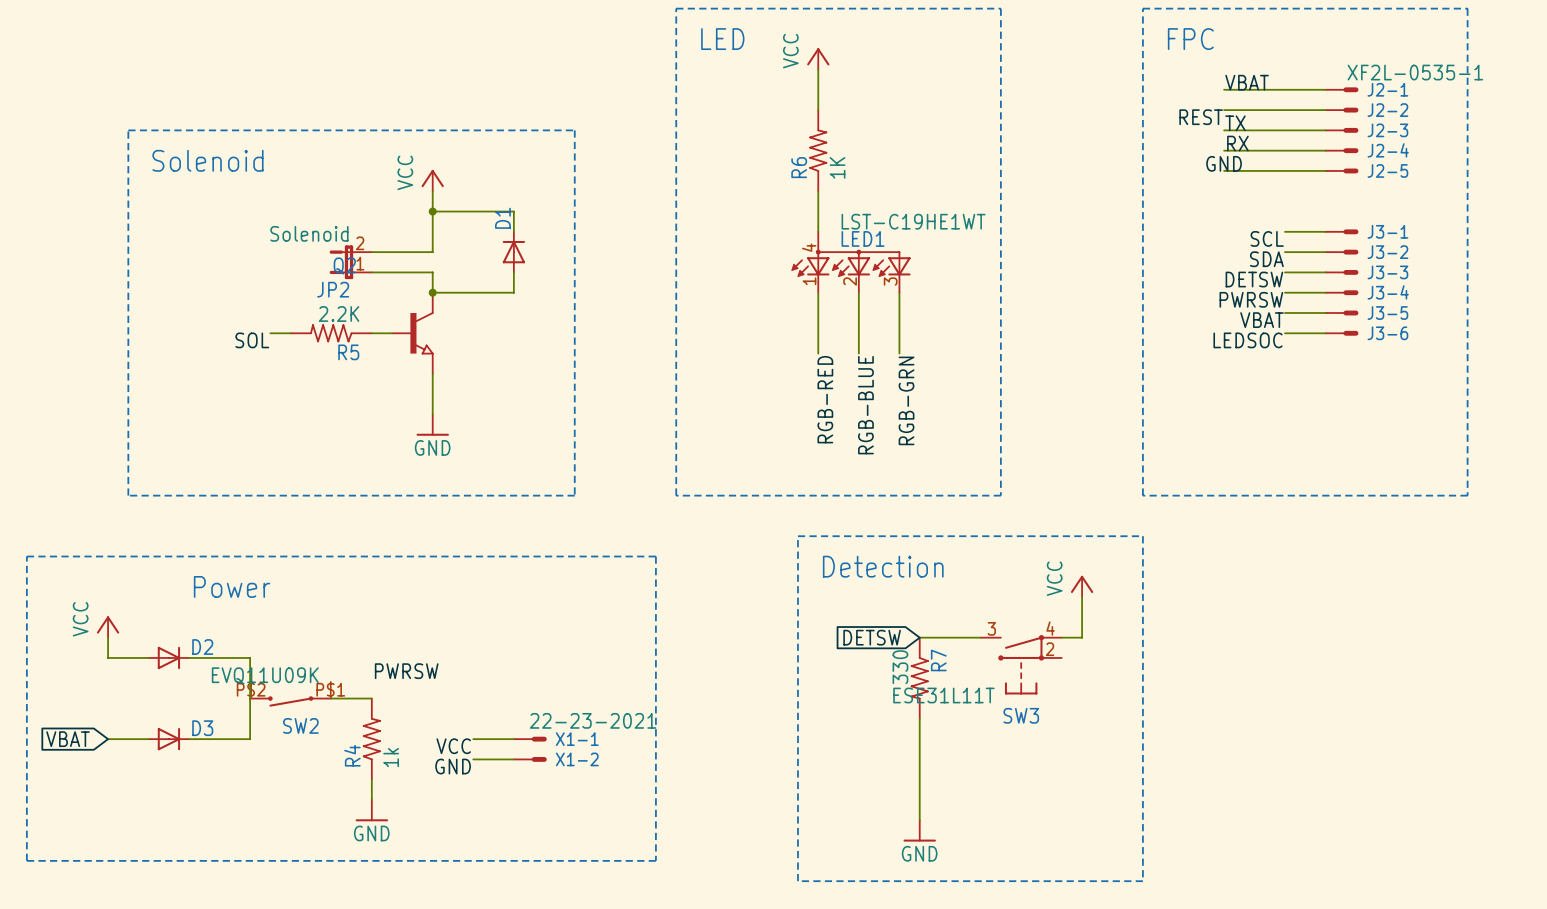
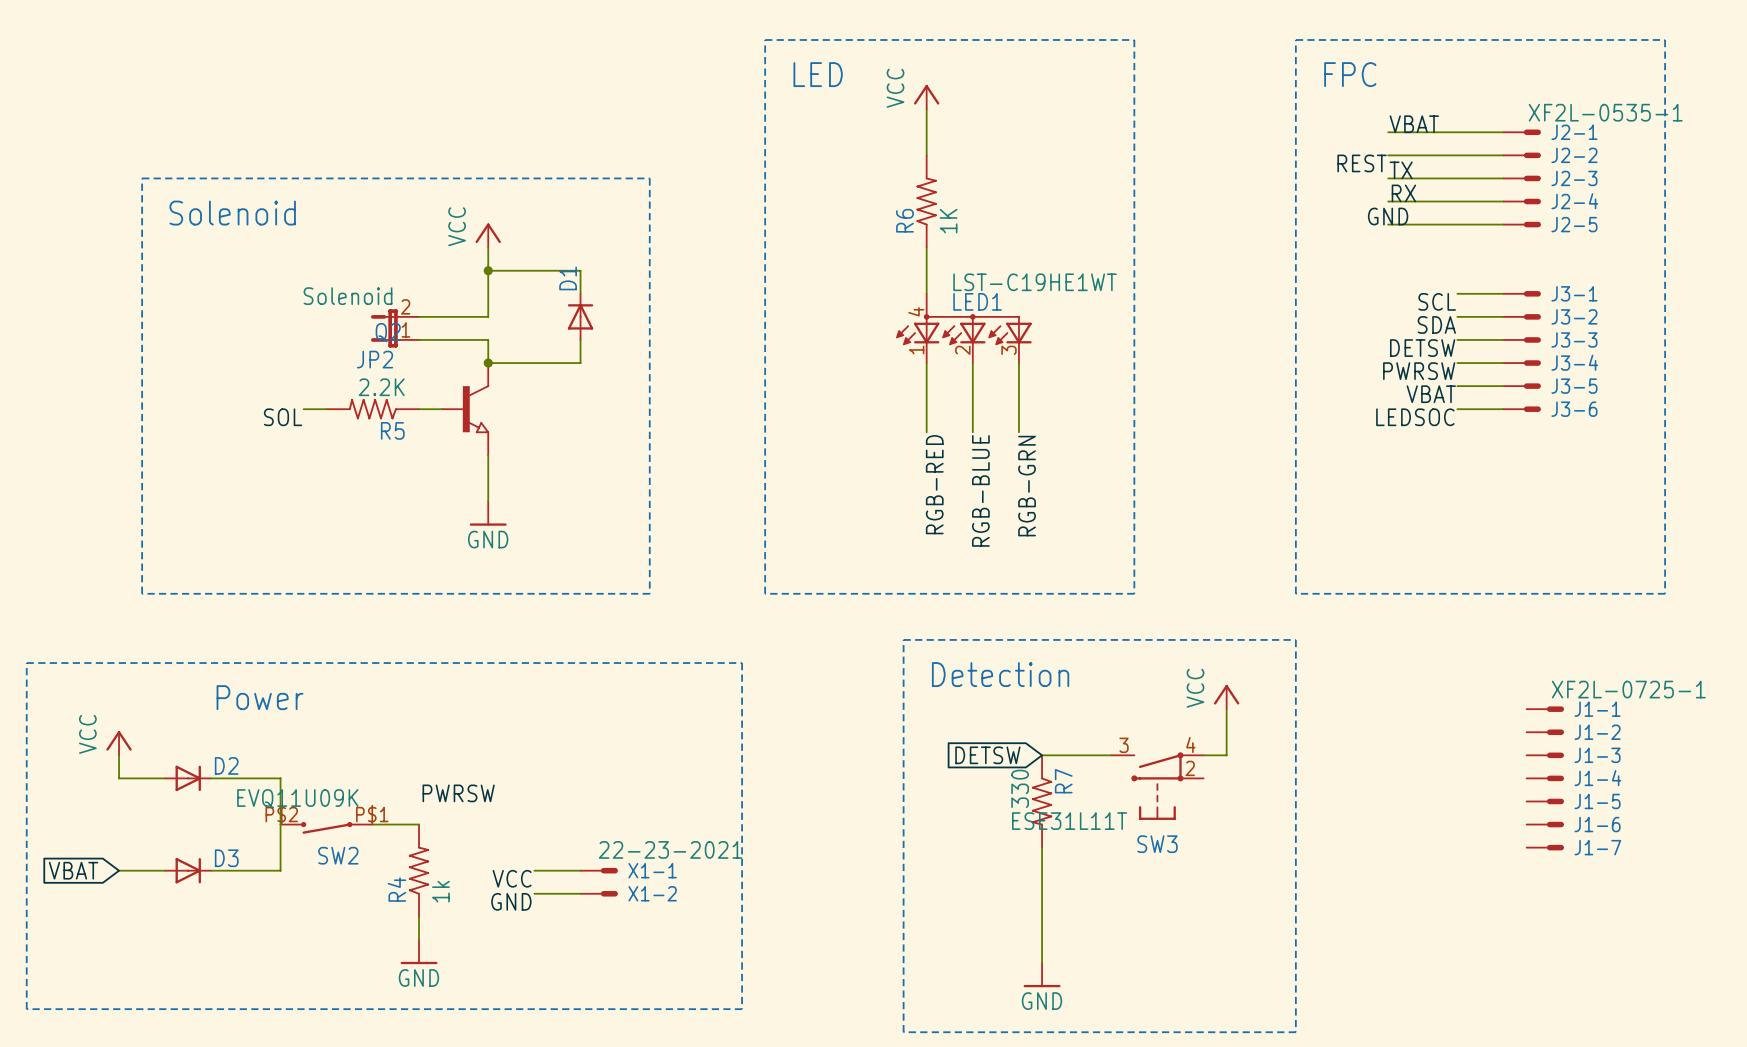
J1-1: none -> XF2L-0725-1 (1545, 709)
J1-2: none -> (1545, 732)
J1-3: none -> (1545, 755)
J1-4: none -> (1545, 778)
J1-5: none -> (1545, 801)
J1-6: none -> (1545, 824)
J1-7: none -> (1545, 847)

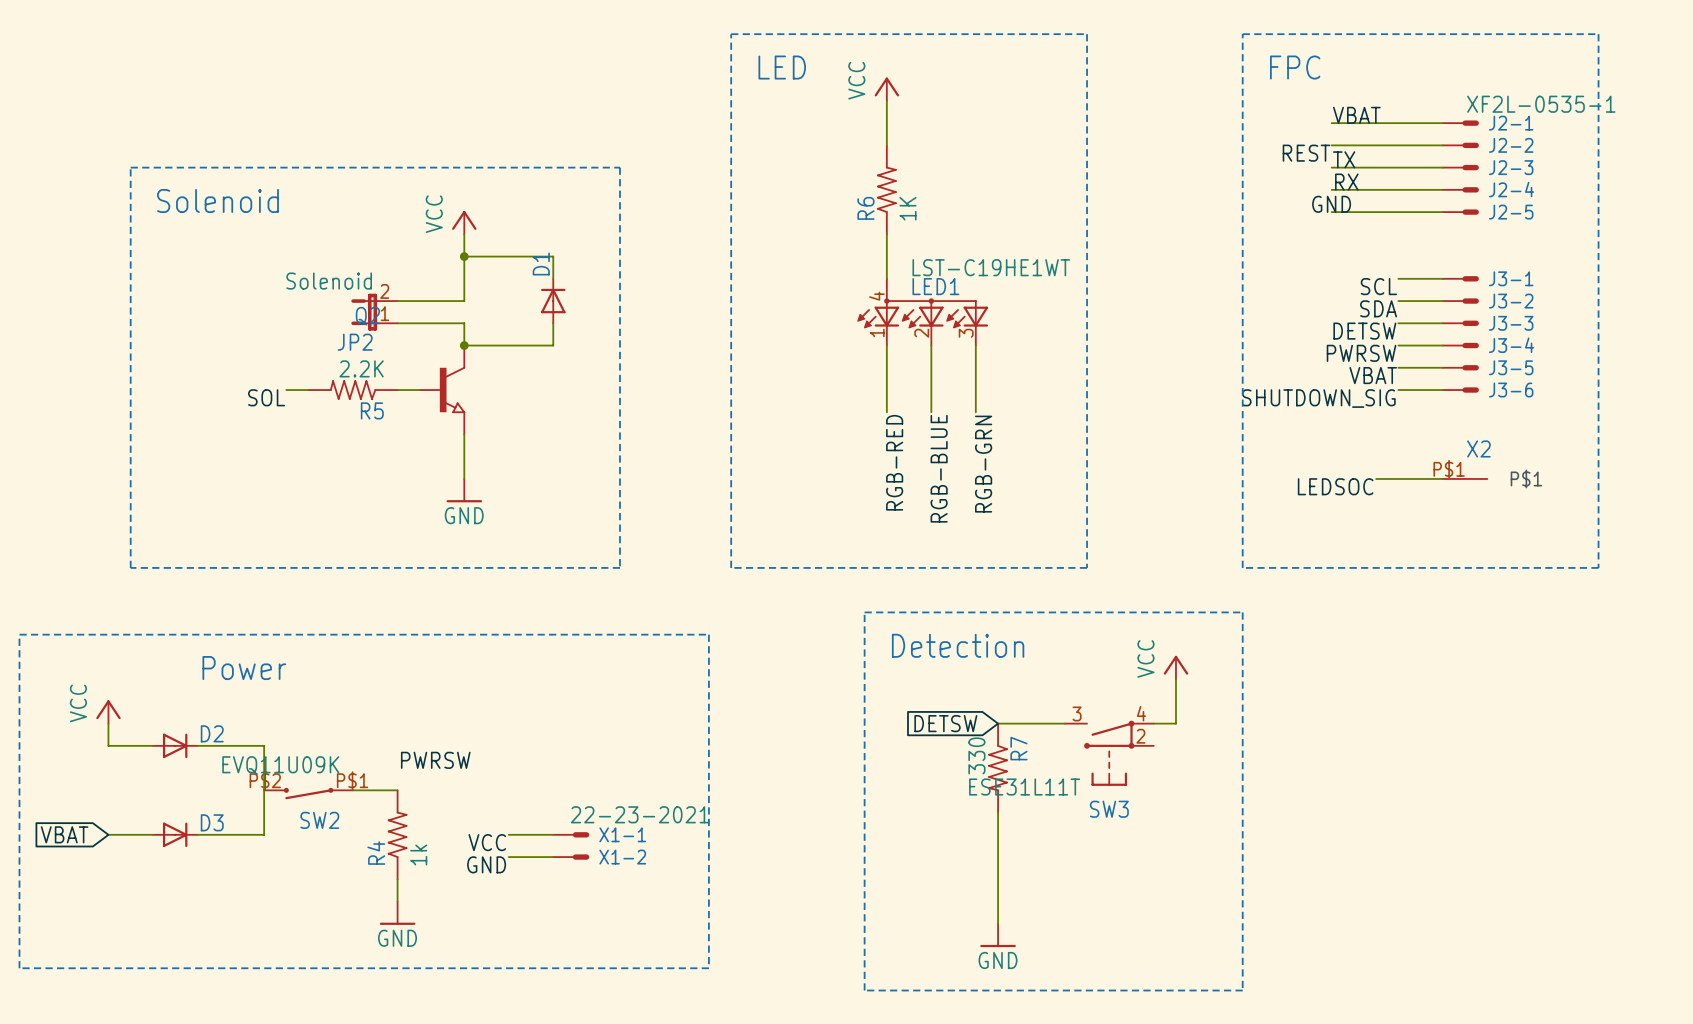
label: LEDSOC (1415, 417) -> SHUTDOWN_SIG (1318, 398)
wire: none -> (1376, 478) (1442, 478)
X2: none -> (1465, 478)
label: none -> LEDSOC (1335, 486)
J1-1: XF2L-0725-1 (1545, 709) -> none
J1-2: (1545, 732) -> none
J1-3: (1545, 755) -> none
J1-4: (1545, 778) -> none
J1-5: (1545, 801) -> none
J1-6: (1545, 824) -> none
J1-7: (1545, 847) -> none

